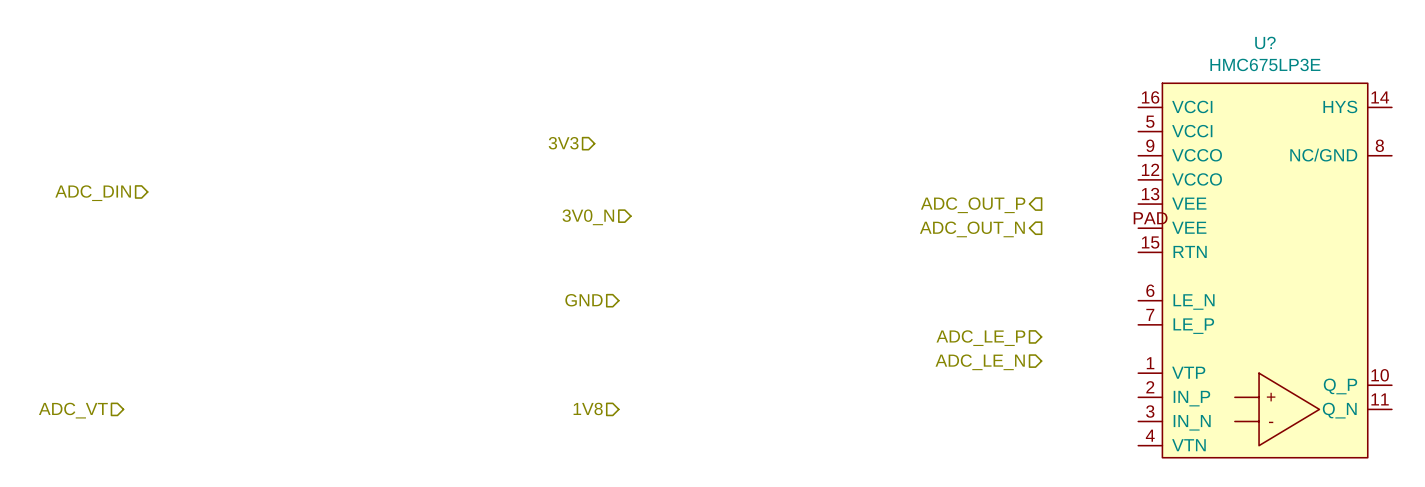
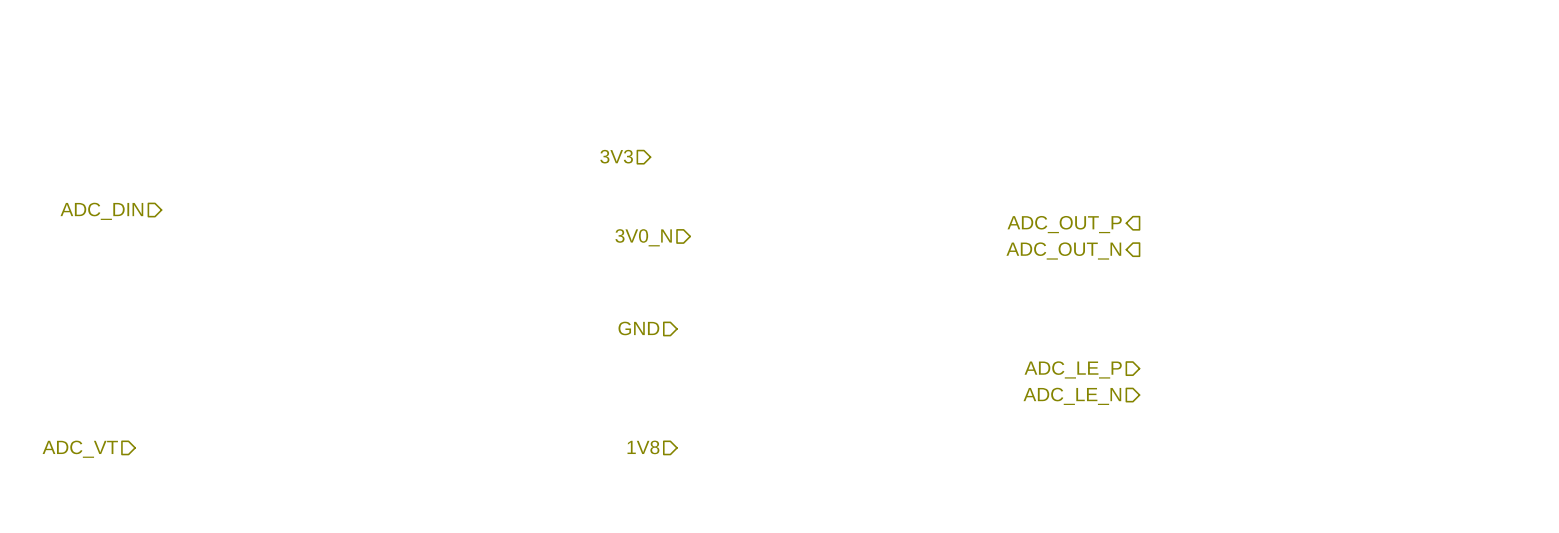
U?: HMC675LP3E (1265, 270) -> none

